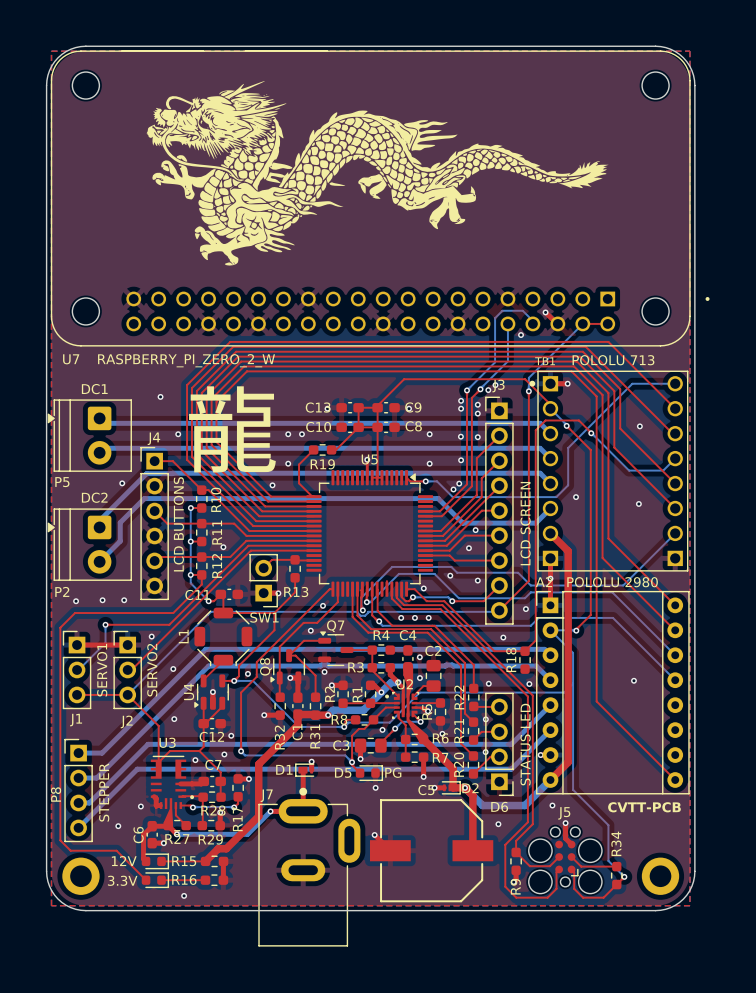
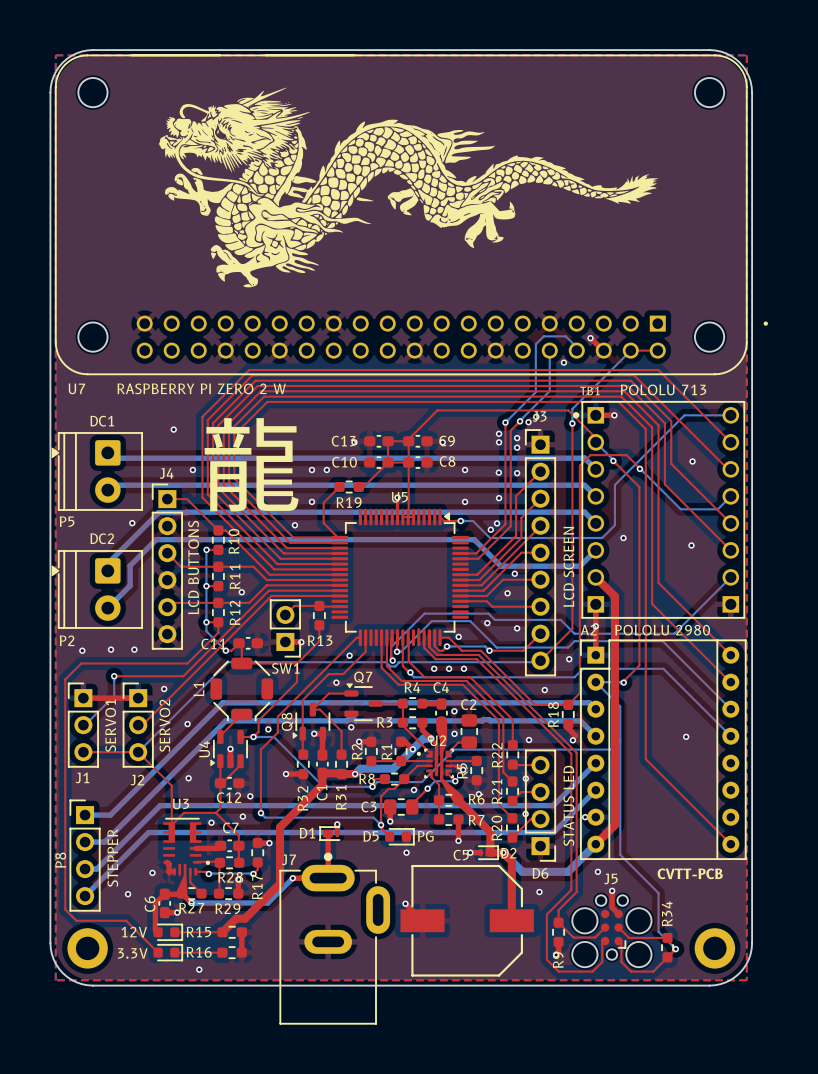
U7 value: RASPBERRY_PI_ZERO_2_W (186, 360) -> RASPBERRY PI ZERO 2 W (201, 388)
top track: none -> (422, 703) (441, 704)
top track: none -> (568, 724) (568, 728) (575, 735)

